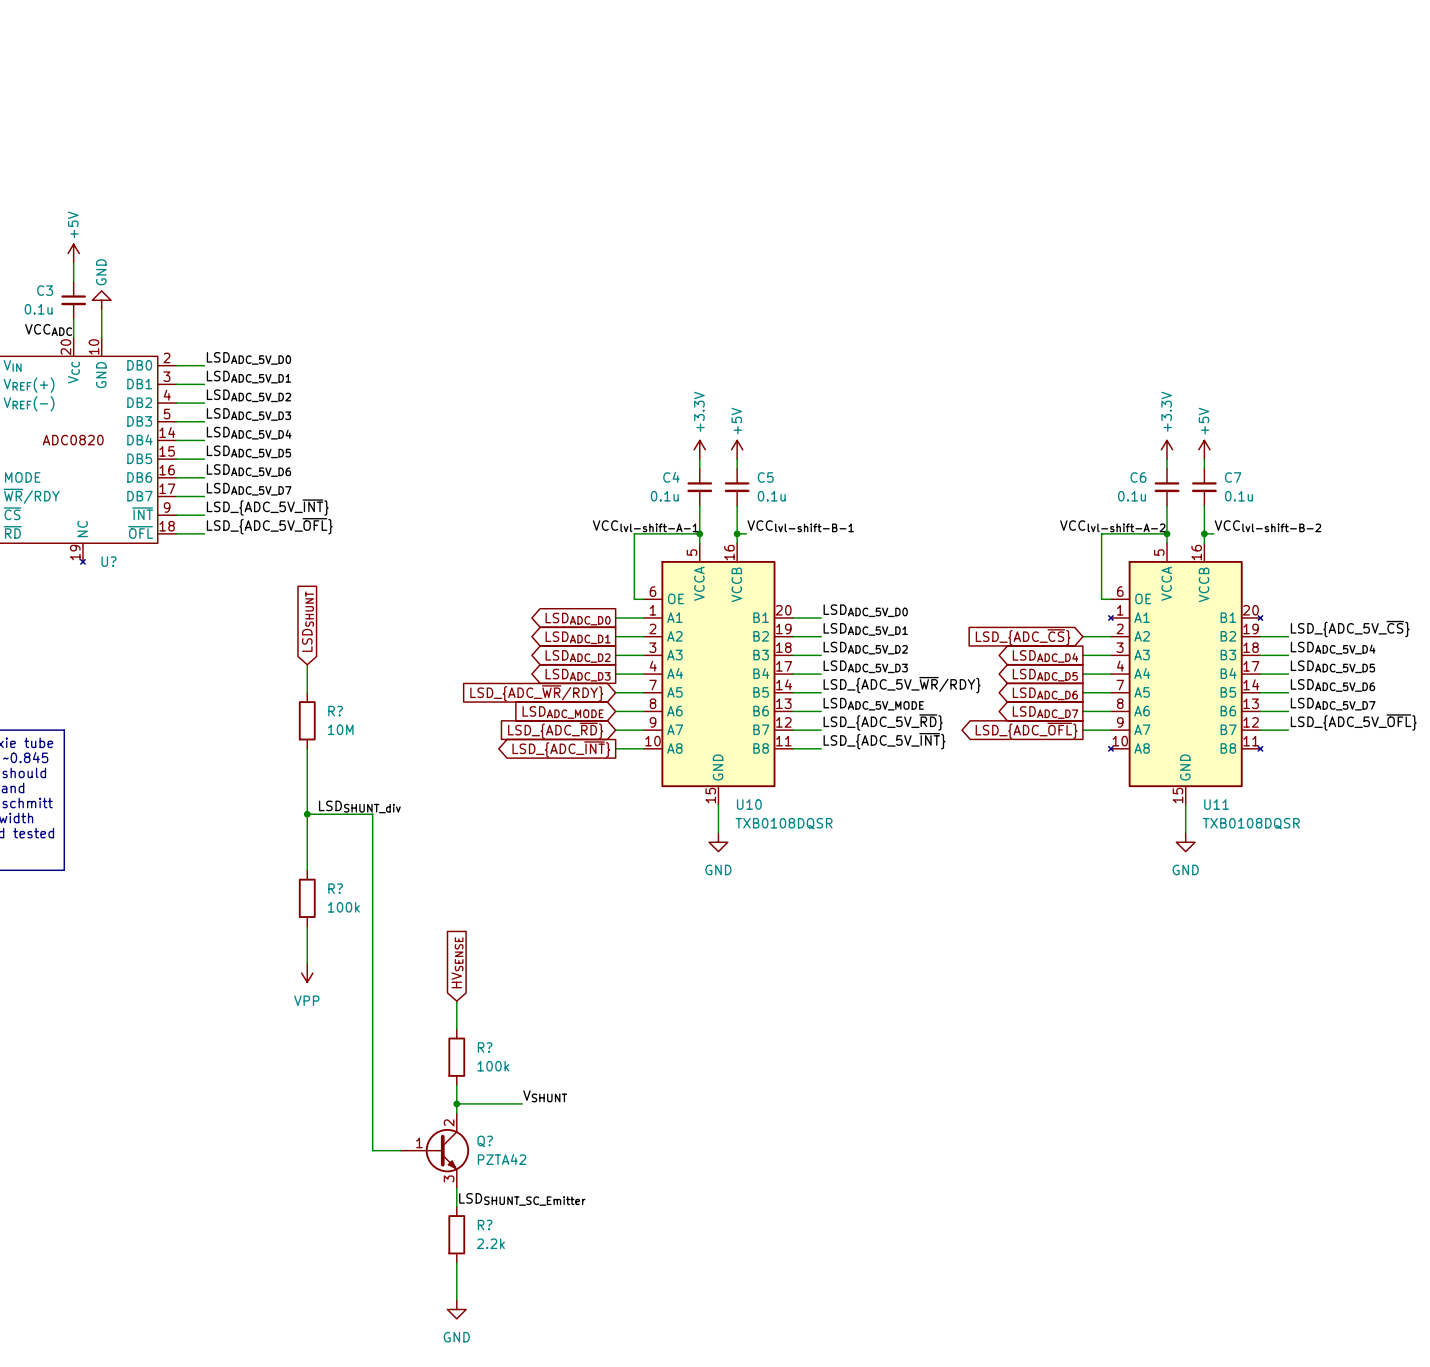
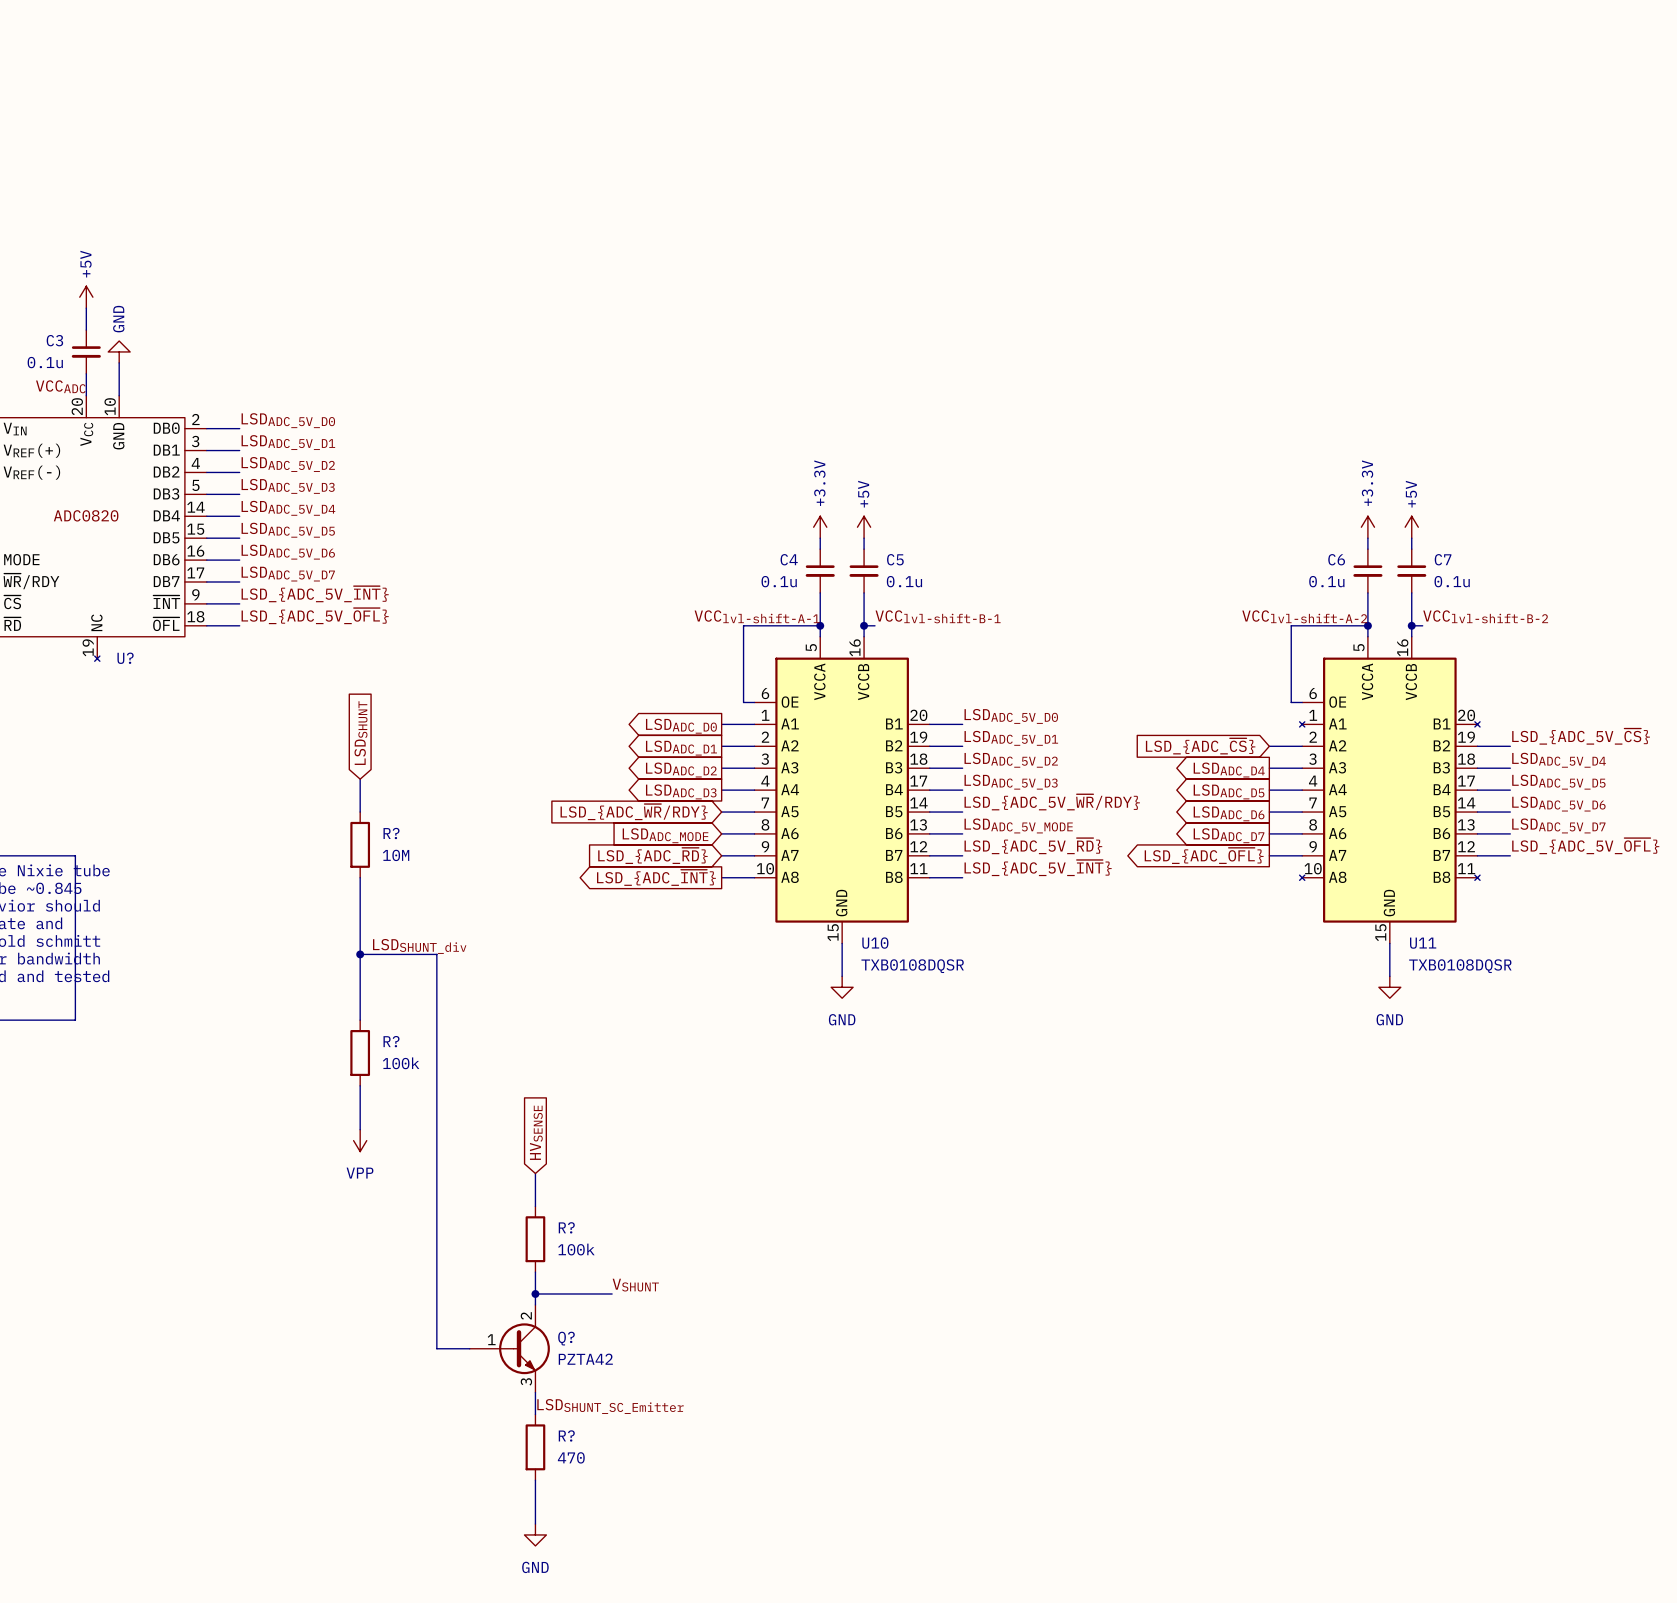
R? value: 2.2k (490, 1243) -> 470 (571, 1457)

